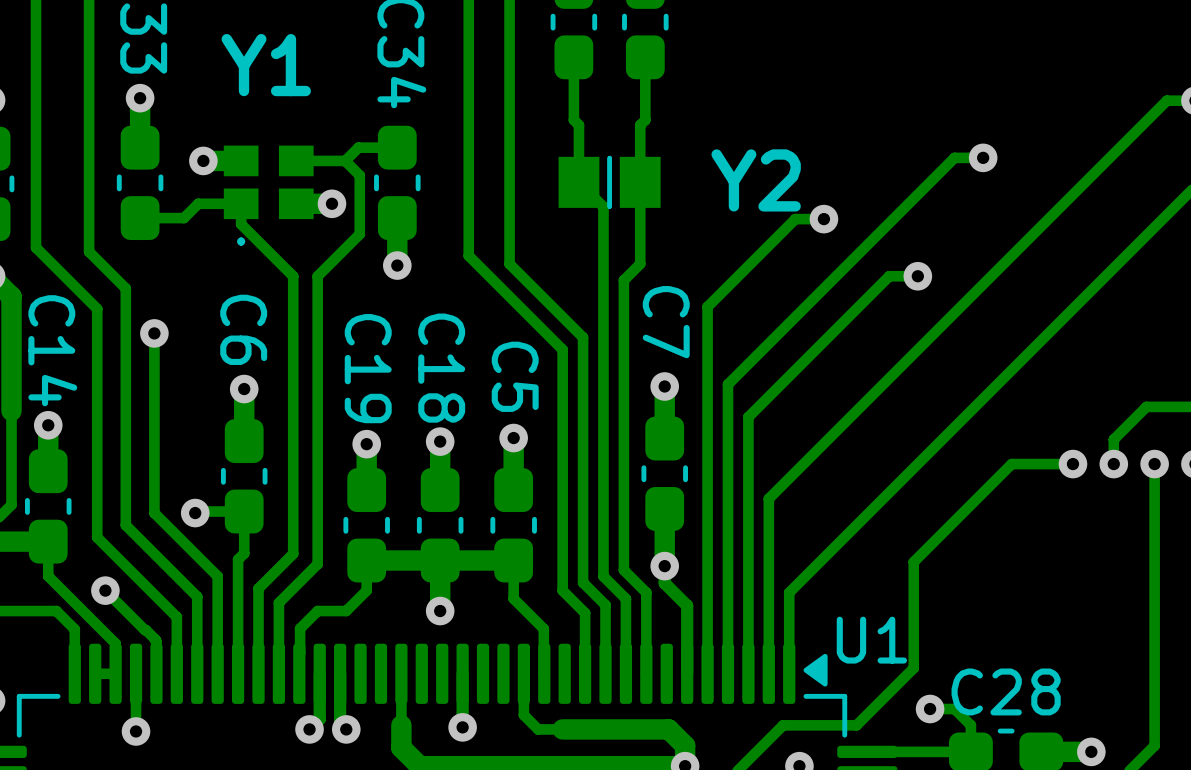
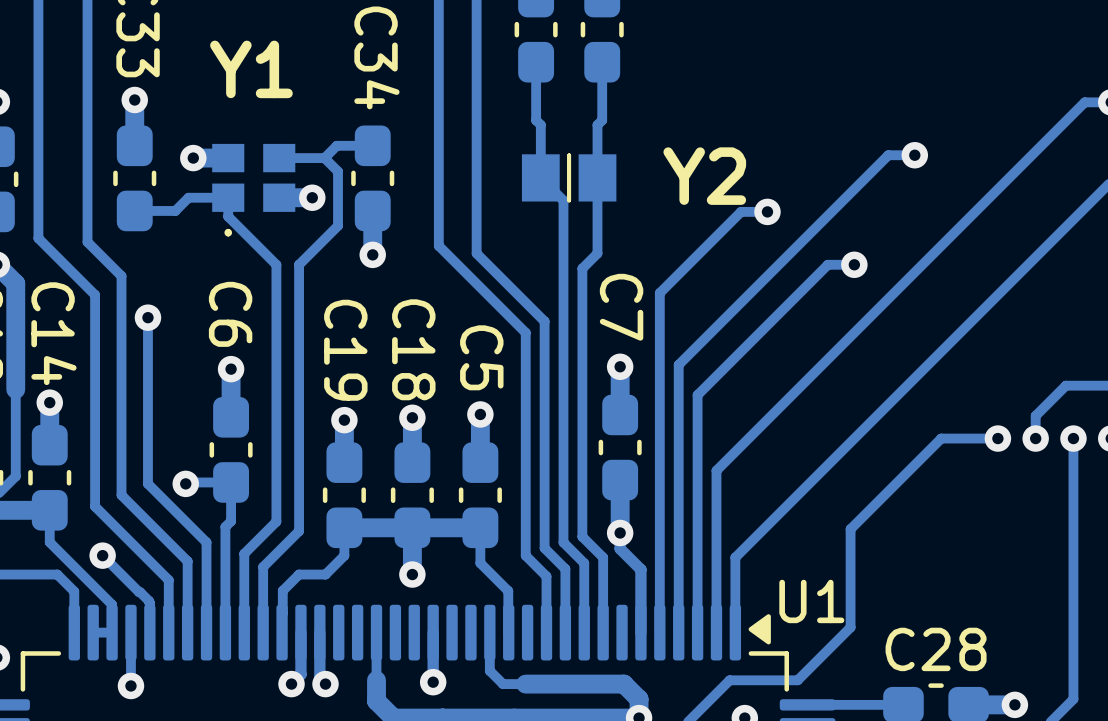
track: (930, 709) (954, 709) (970, 725) (970, 751) -> none
via: (930, 709) -> none

